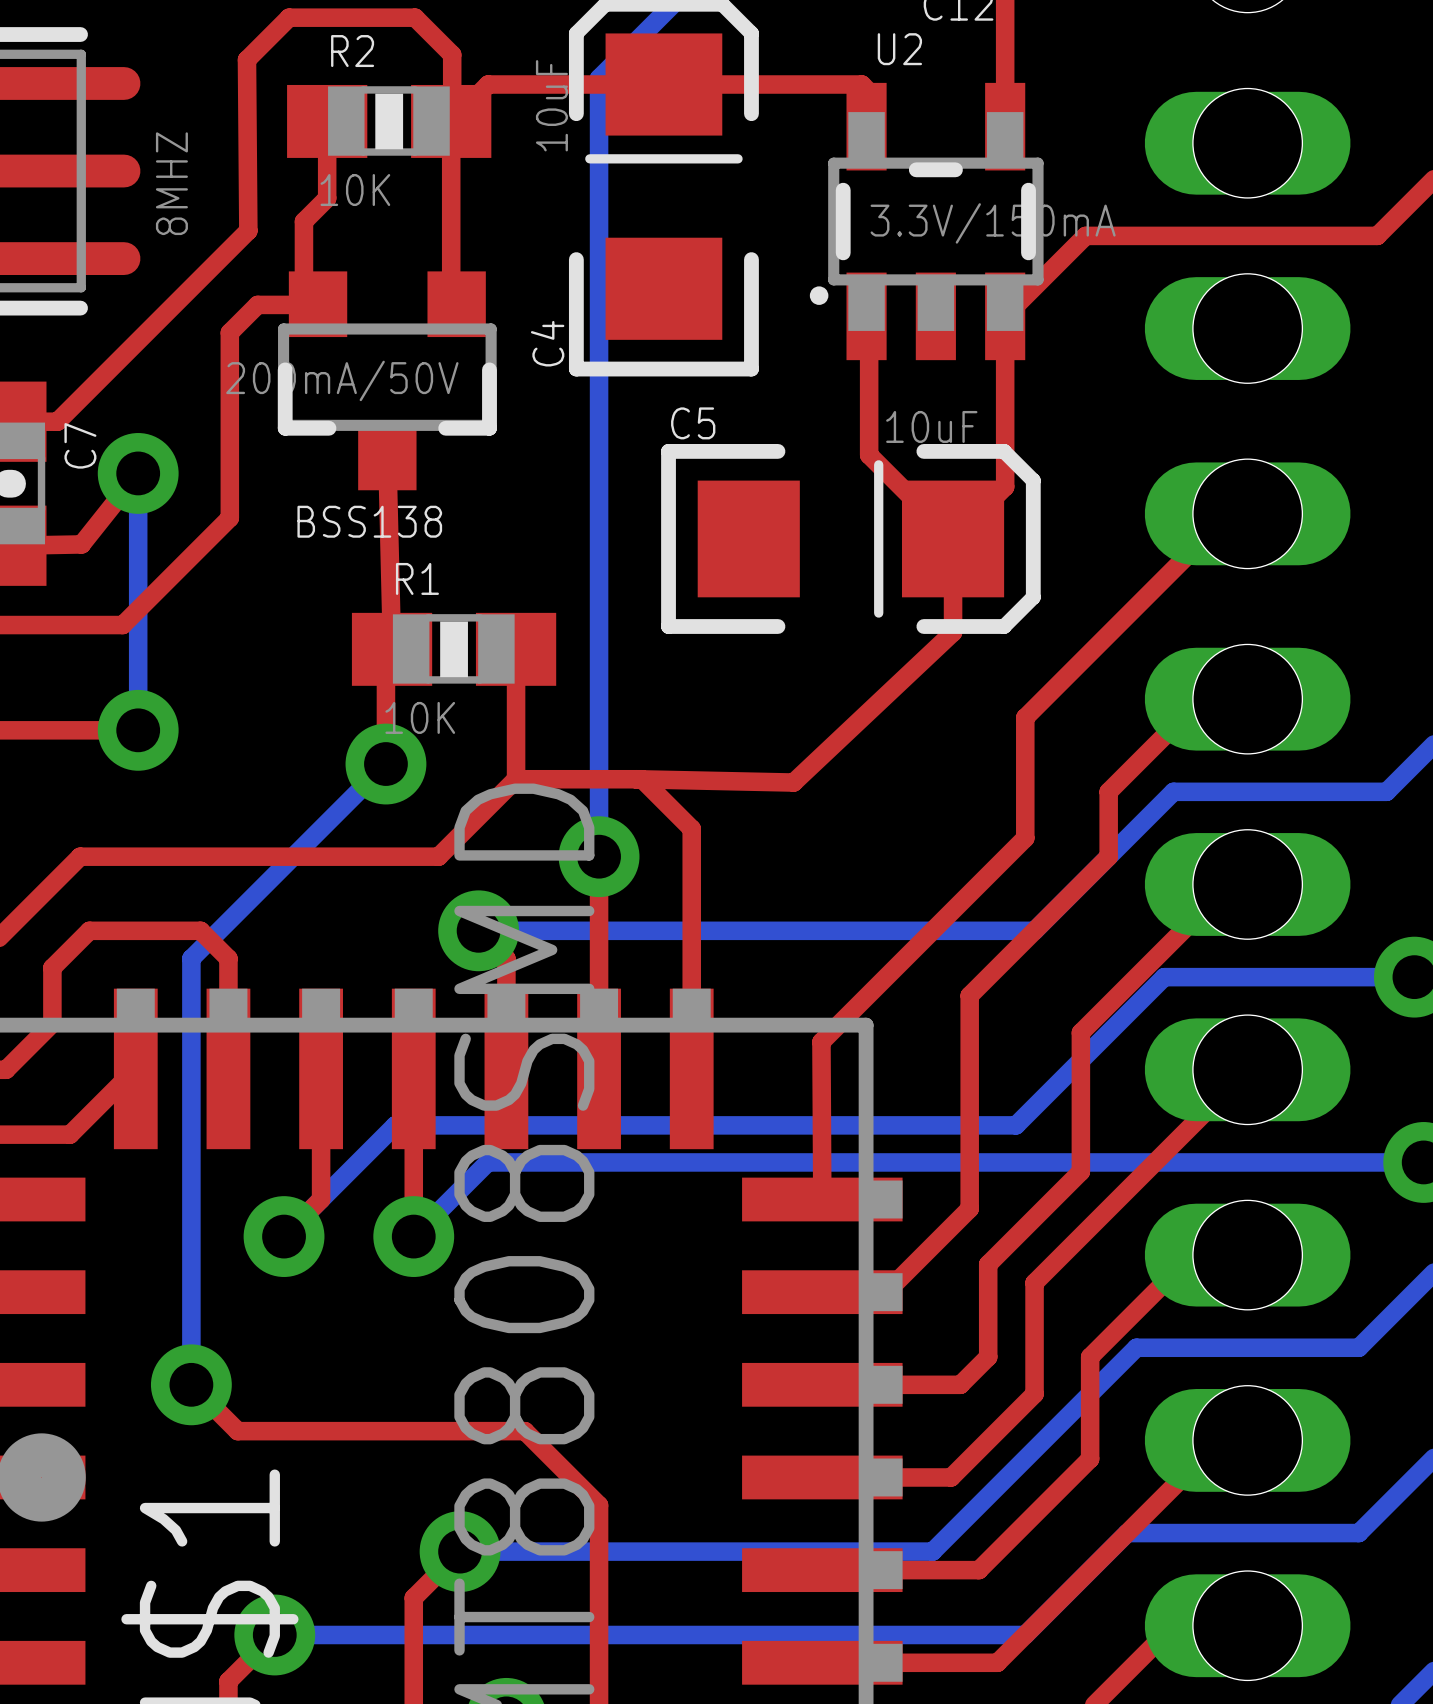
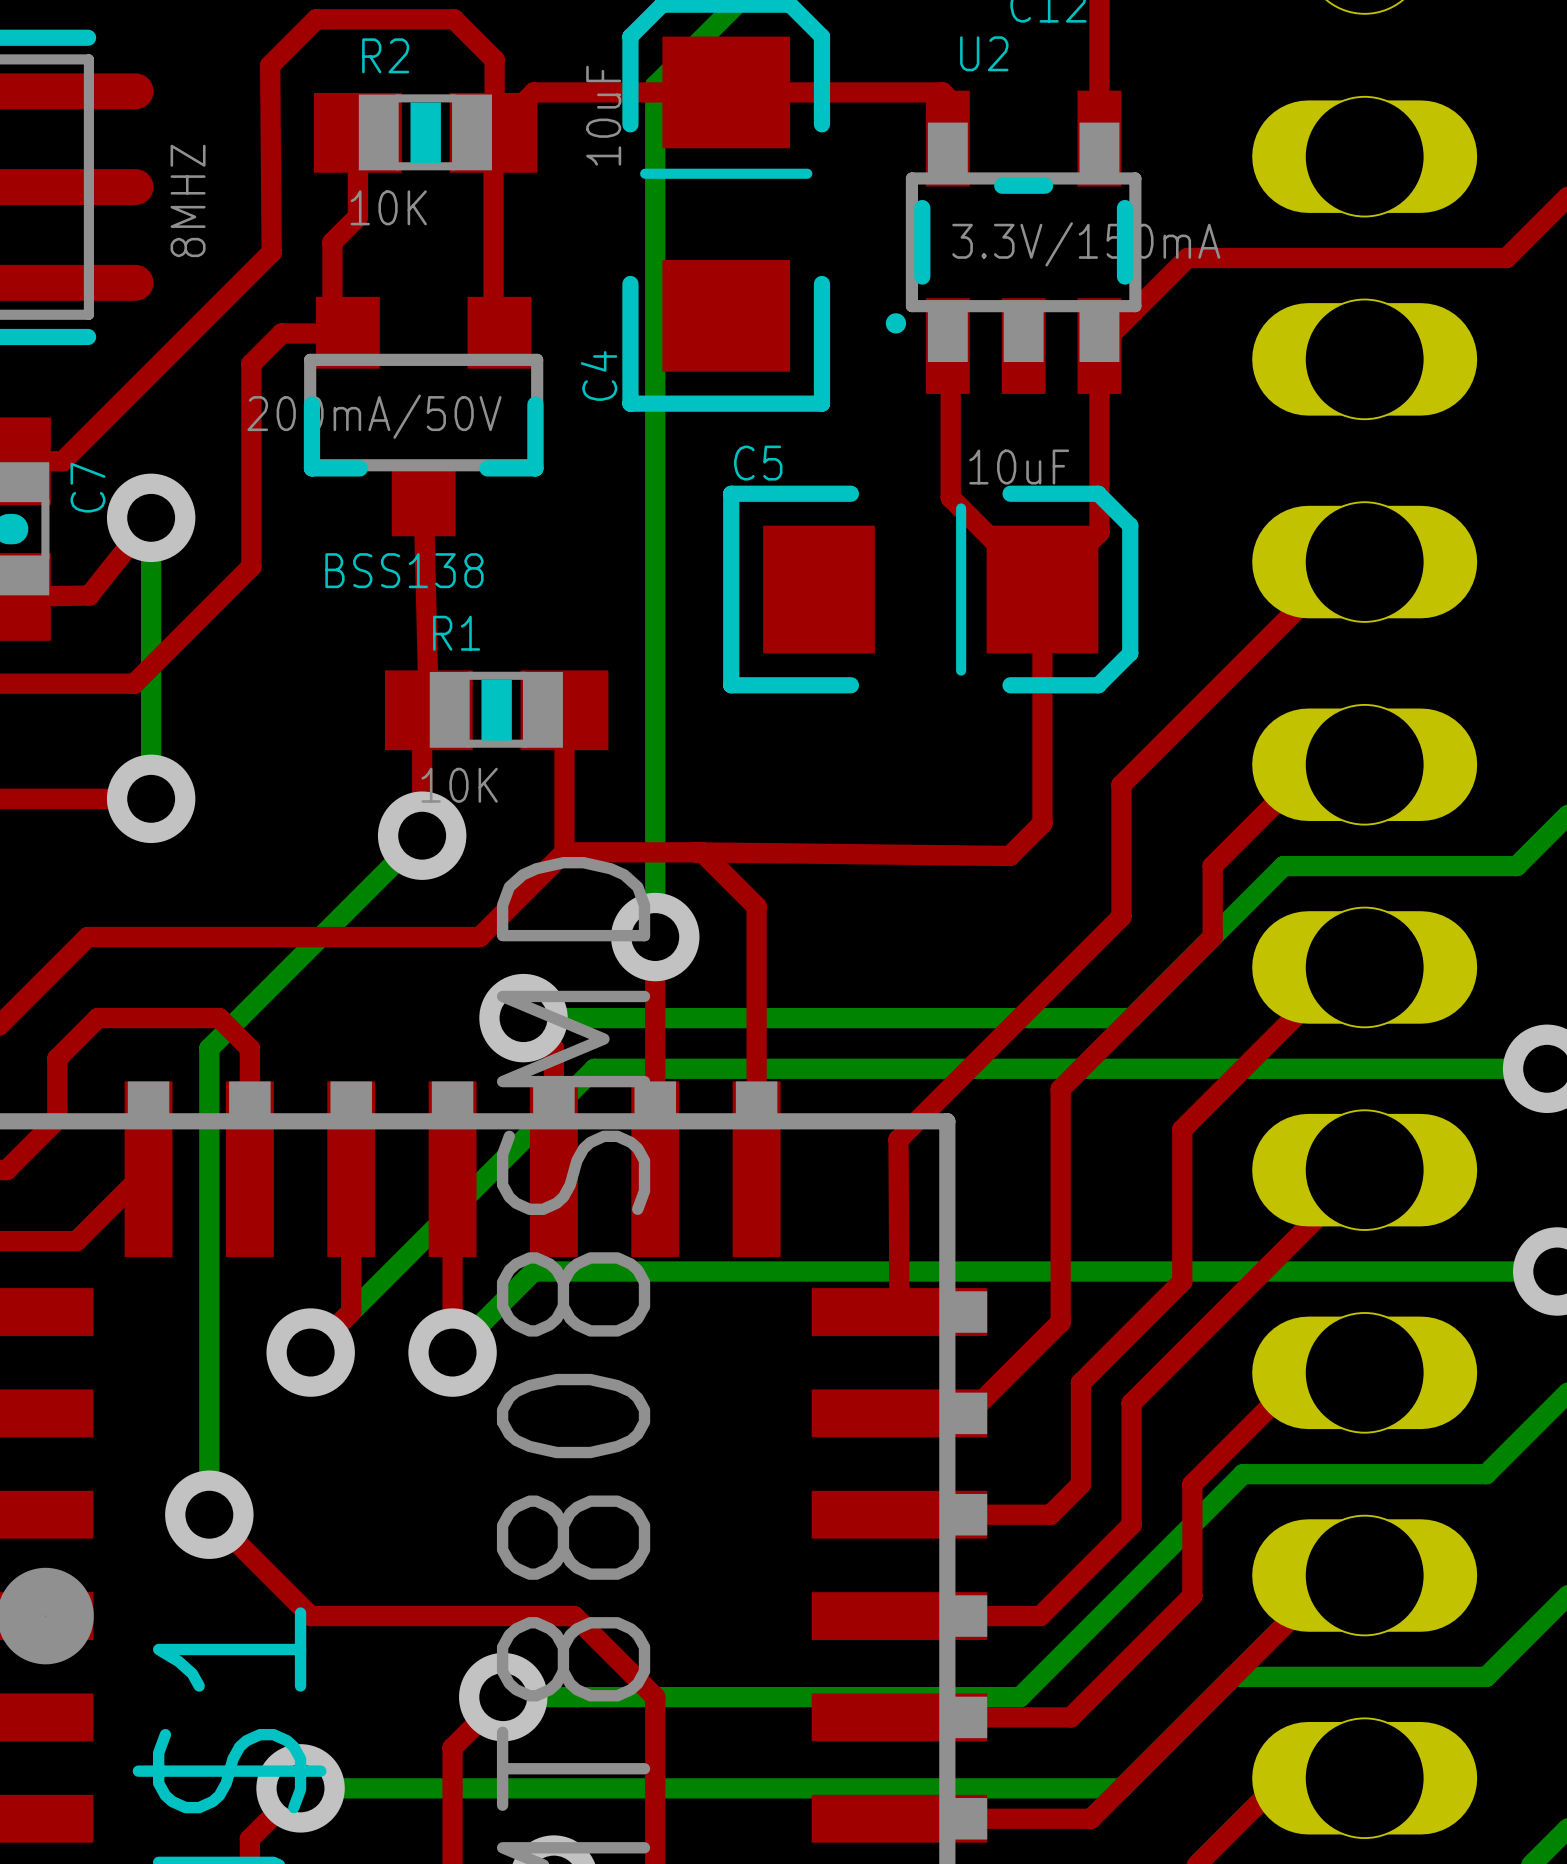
top track: (953, 632) (793, 782) (636, 779) -> (1042, 691) (1042, 823) (1009, 855) (695, 852)
bottom track: (1164, 977) (1016, 1125) (395, 1125) -> (1273, 1068) (594, 1068) (432, 1230)
top track: (237, 1431) (524, 1431) (599, 1505) (599, 1551) -> (260, 1565) (310, 1616) (574, 1616) (655, 1697)

